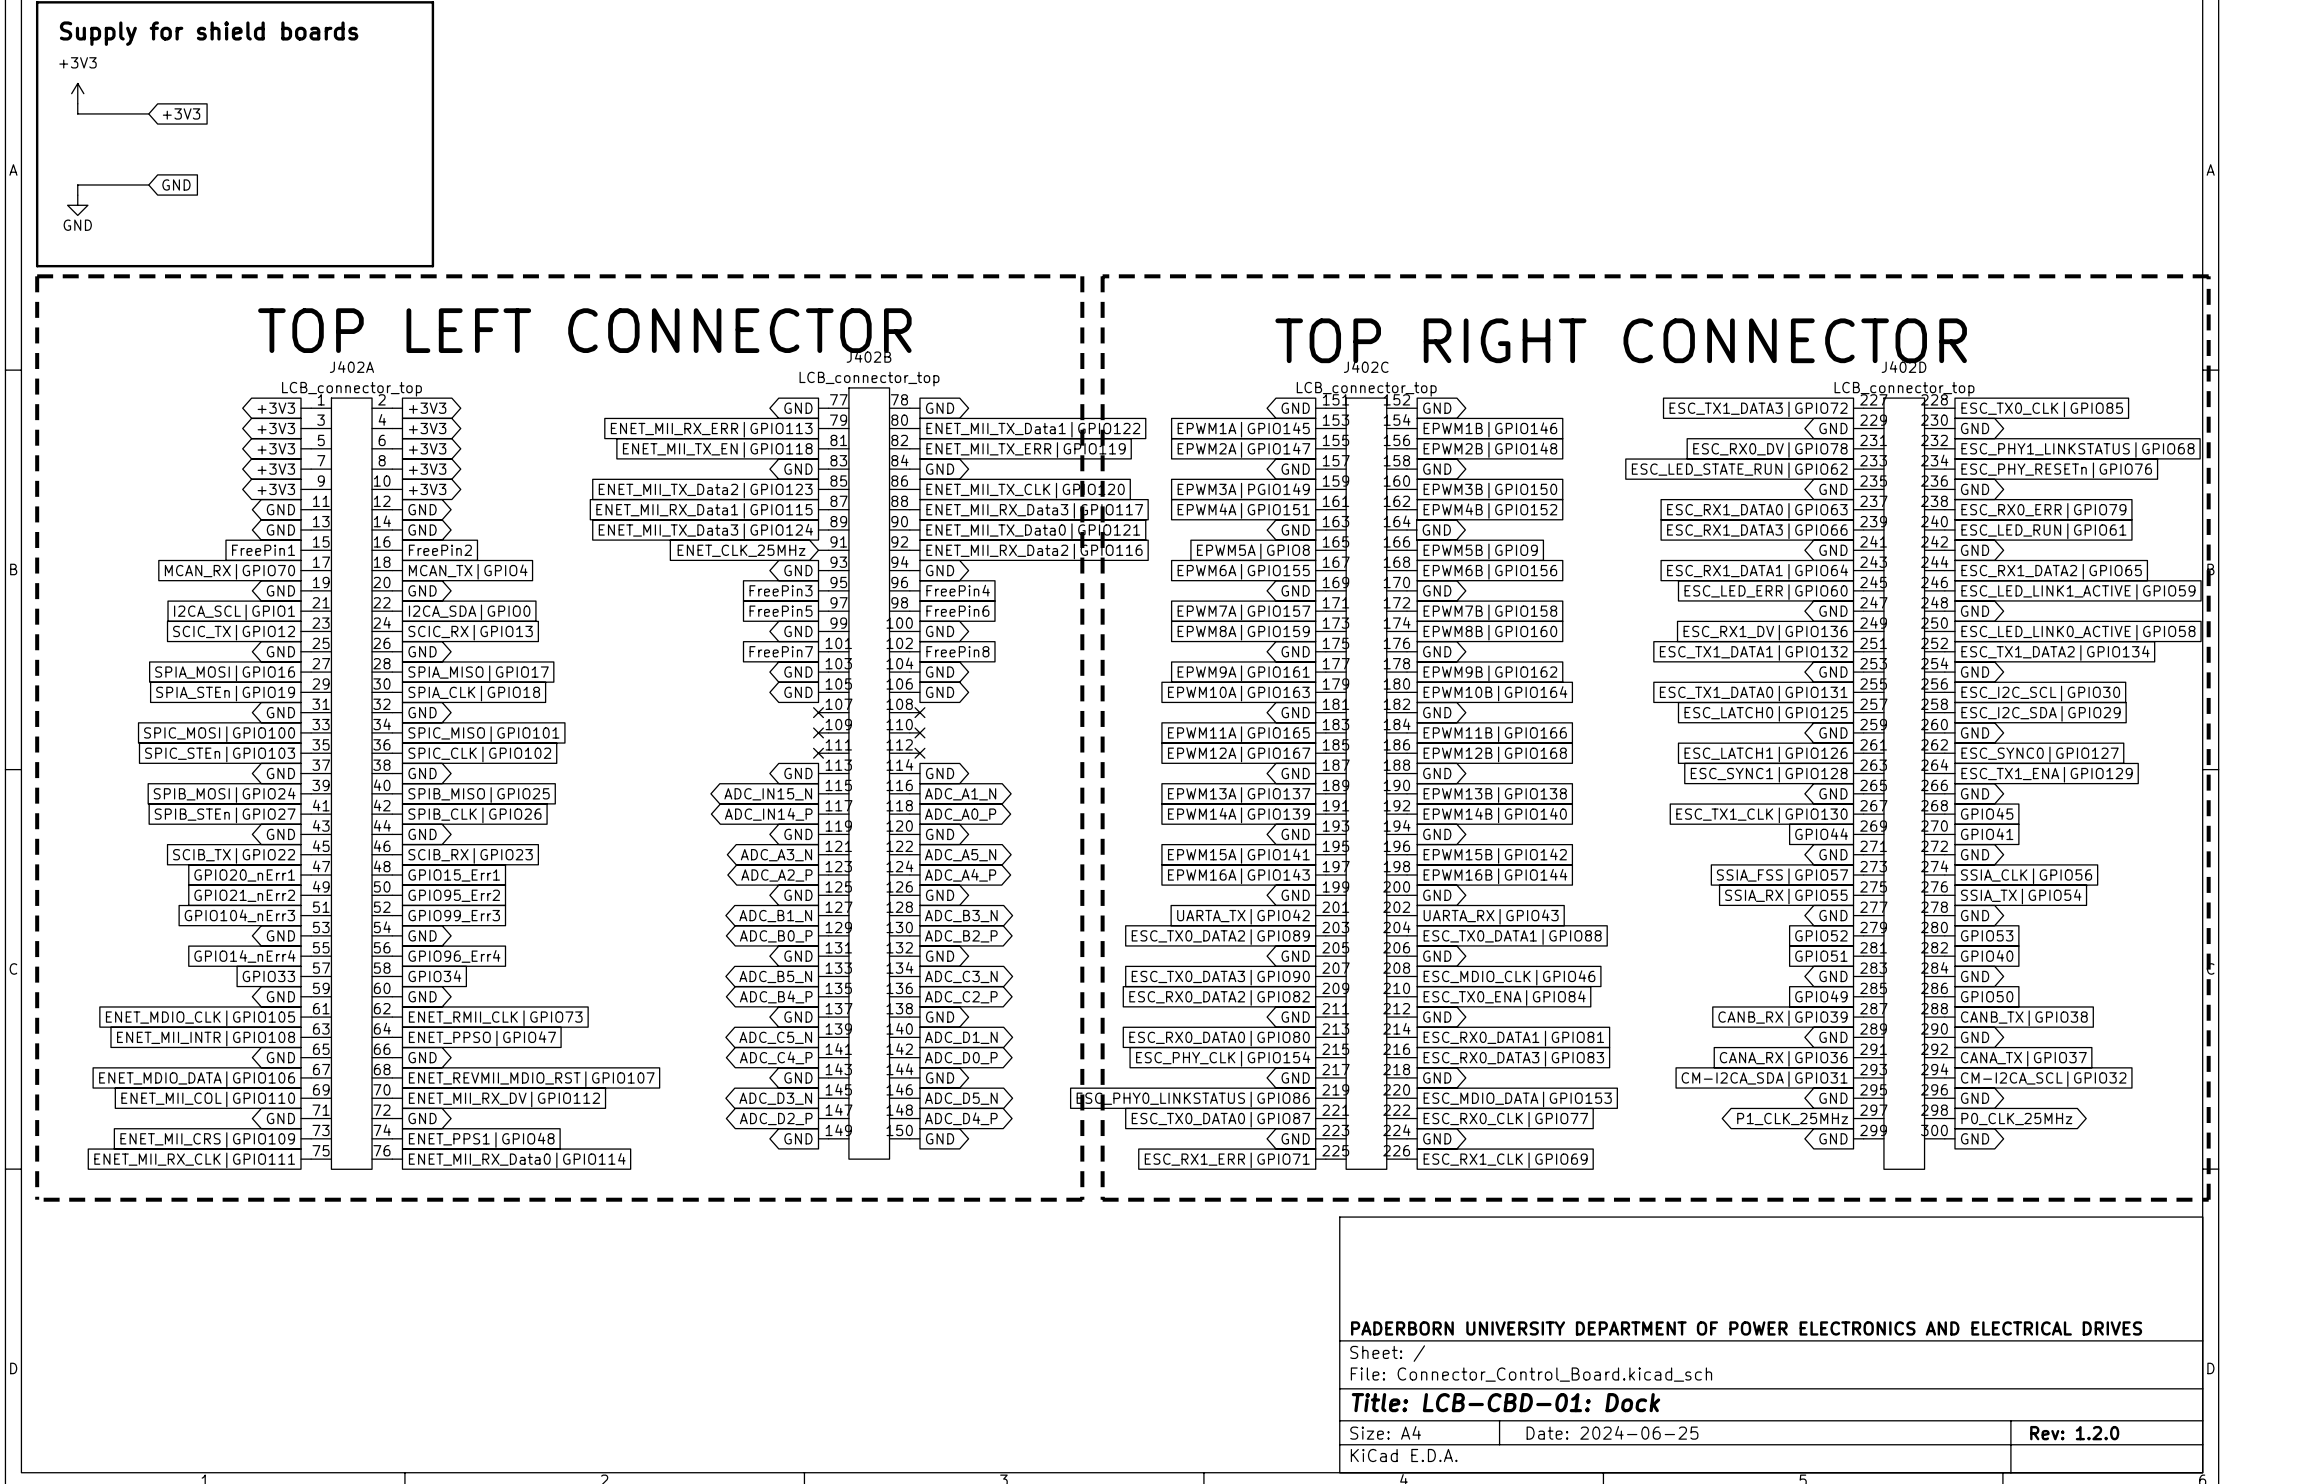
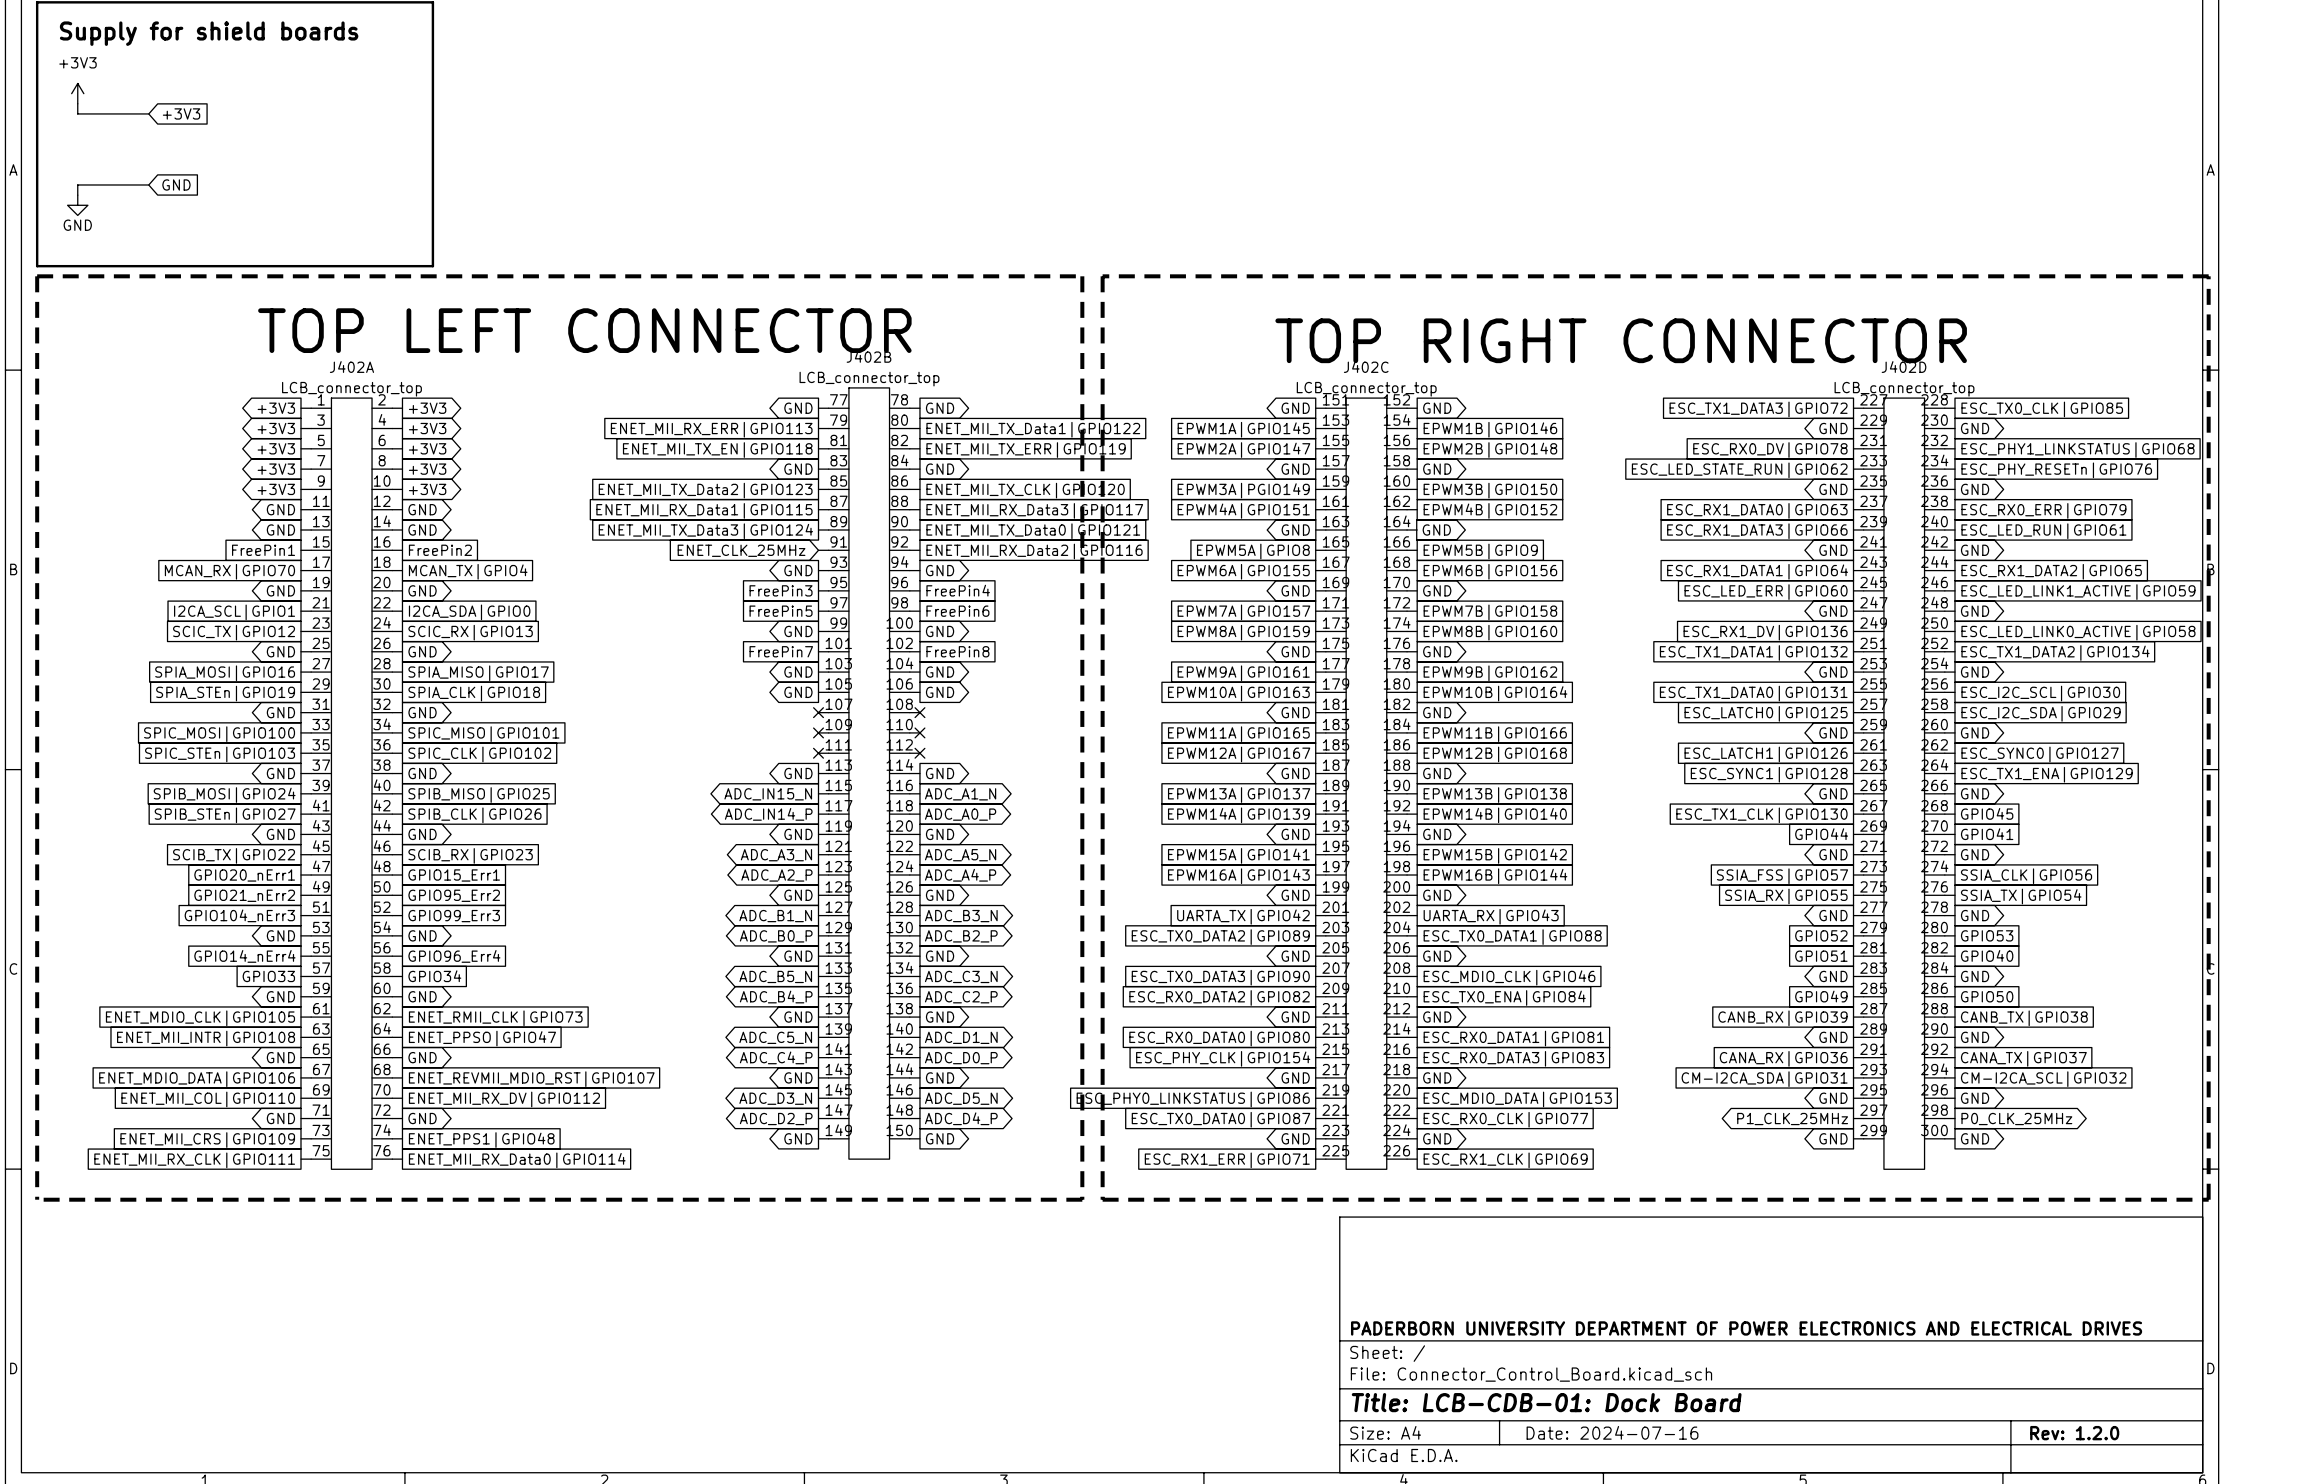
title block: Title: LCB-CBD-01: Dock (1505, 1402) -> Title: LCB-CDB-01: Dock Board (1546, 1402)
title block: Date: 2024-06-25 (1612, 1432) -> Date: 2024-07-16 (1612, 1432)

